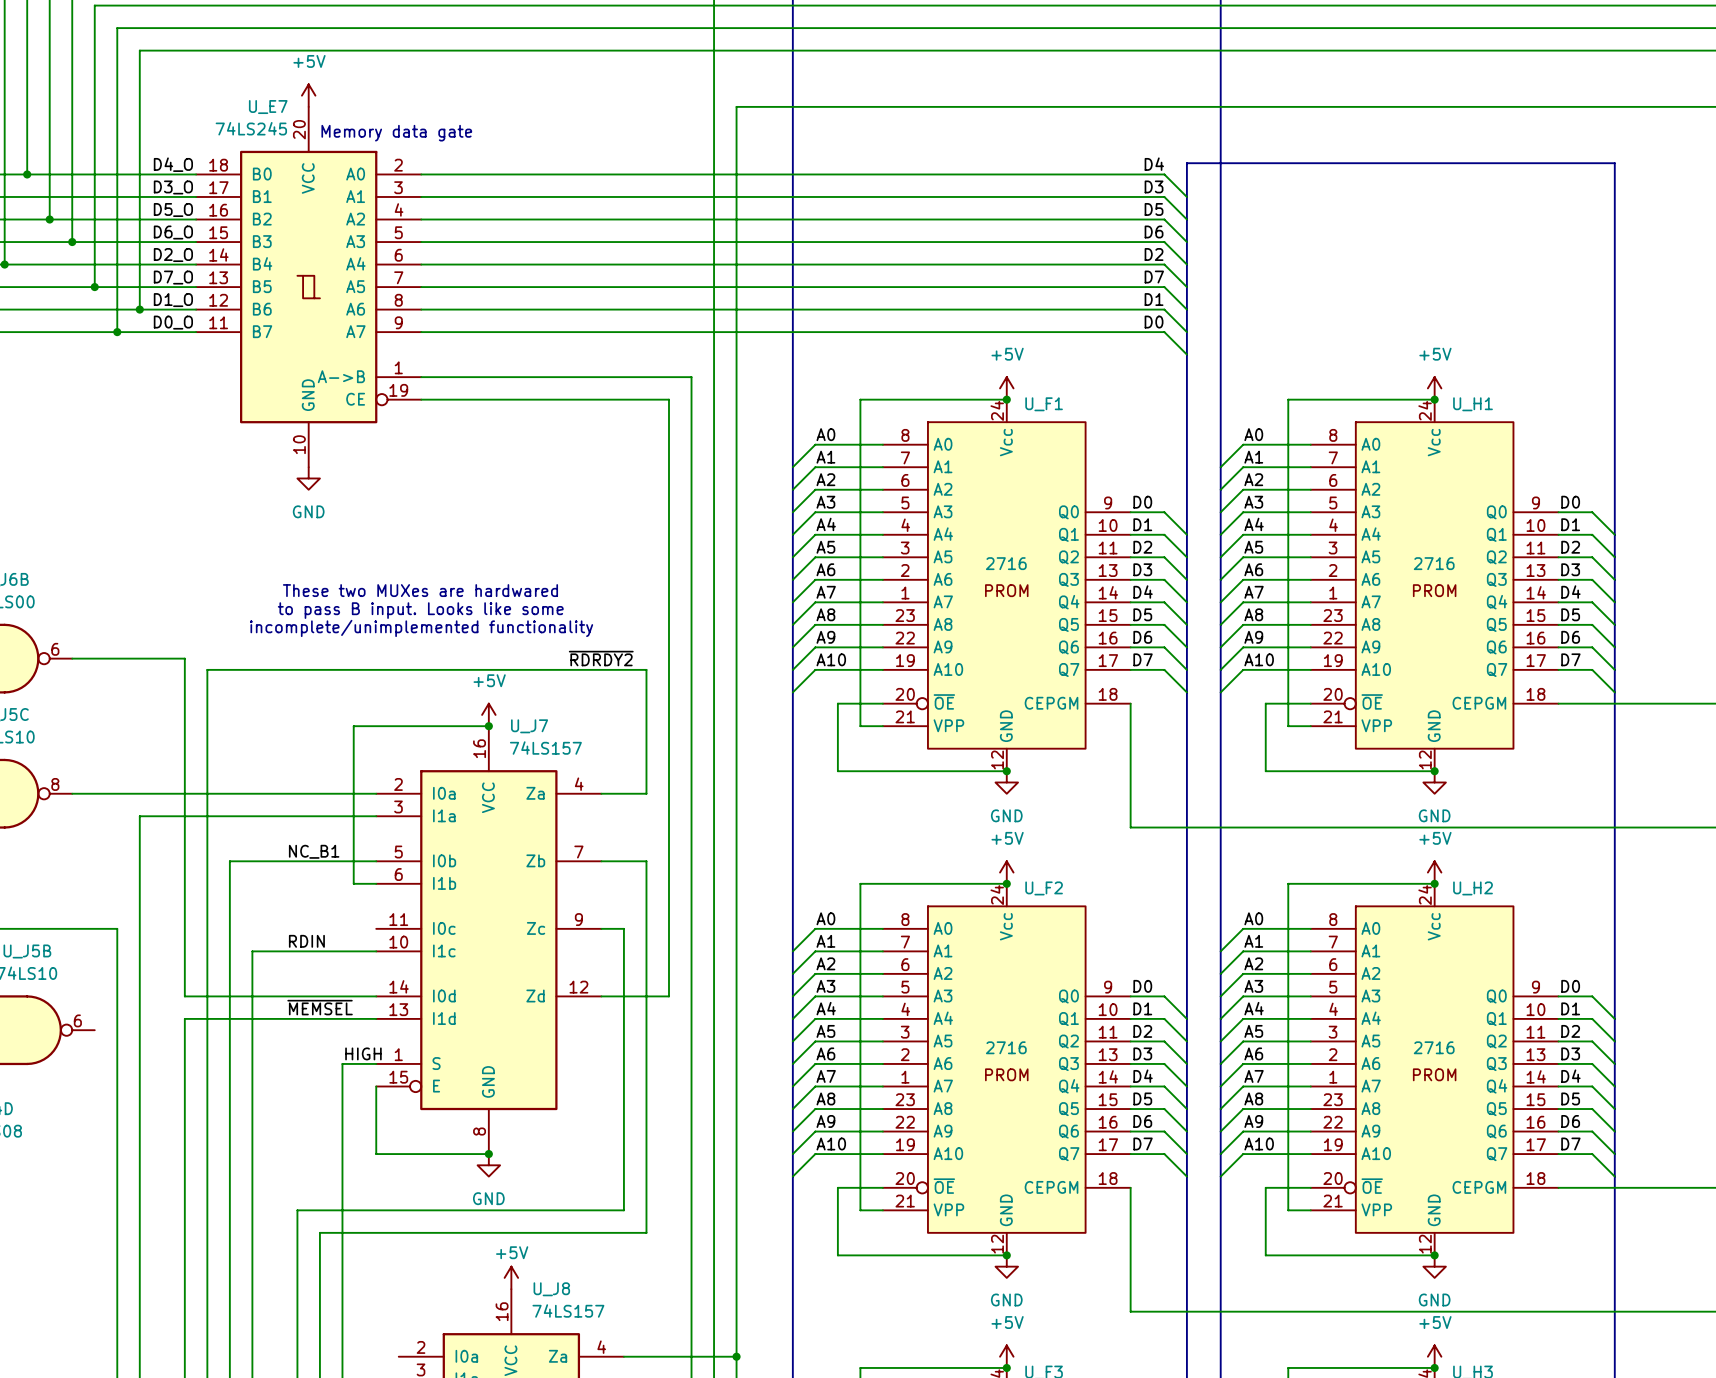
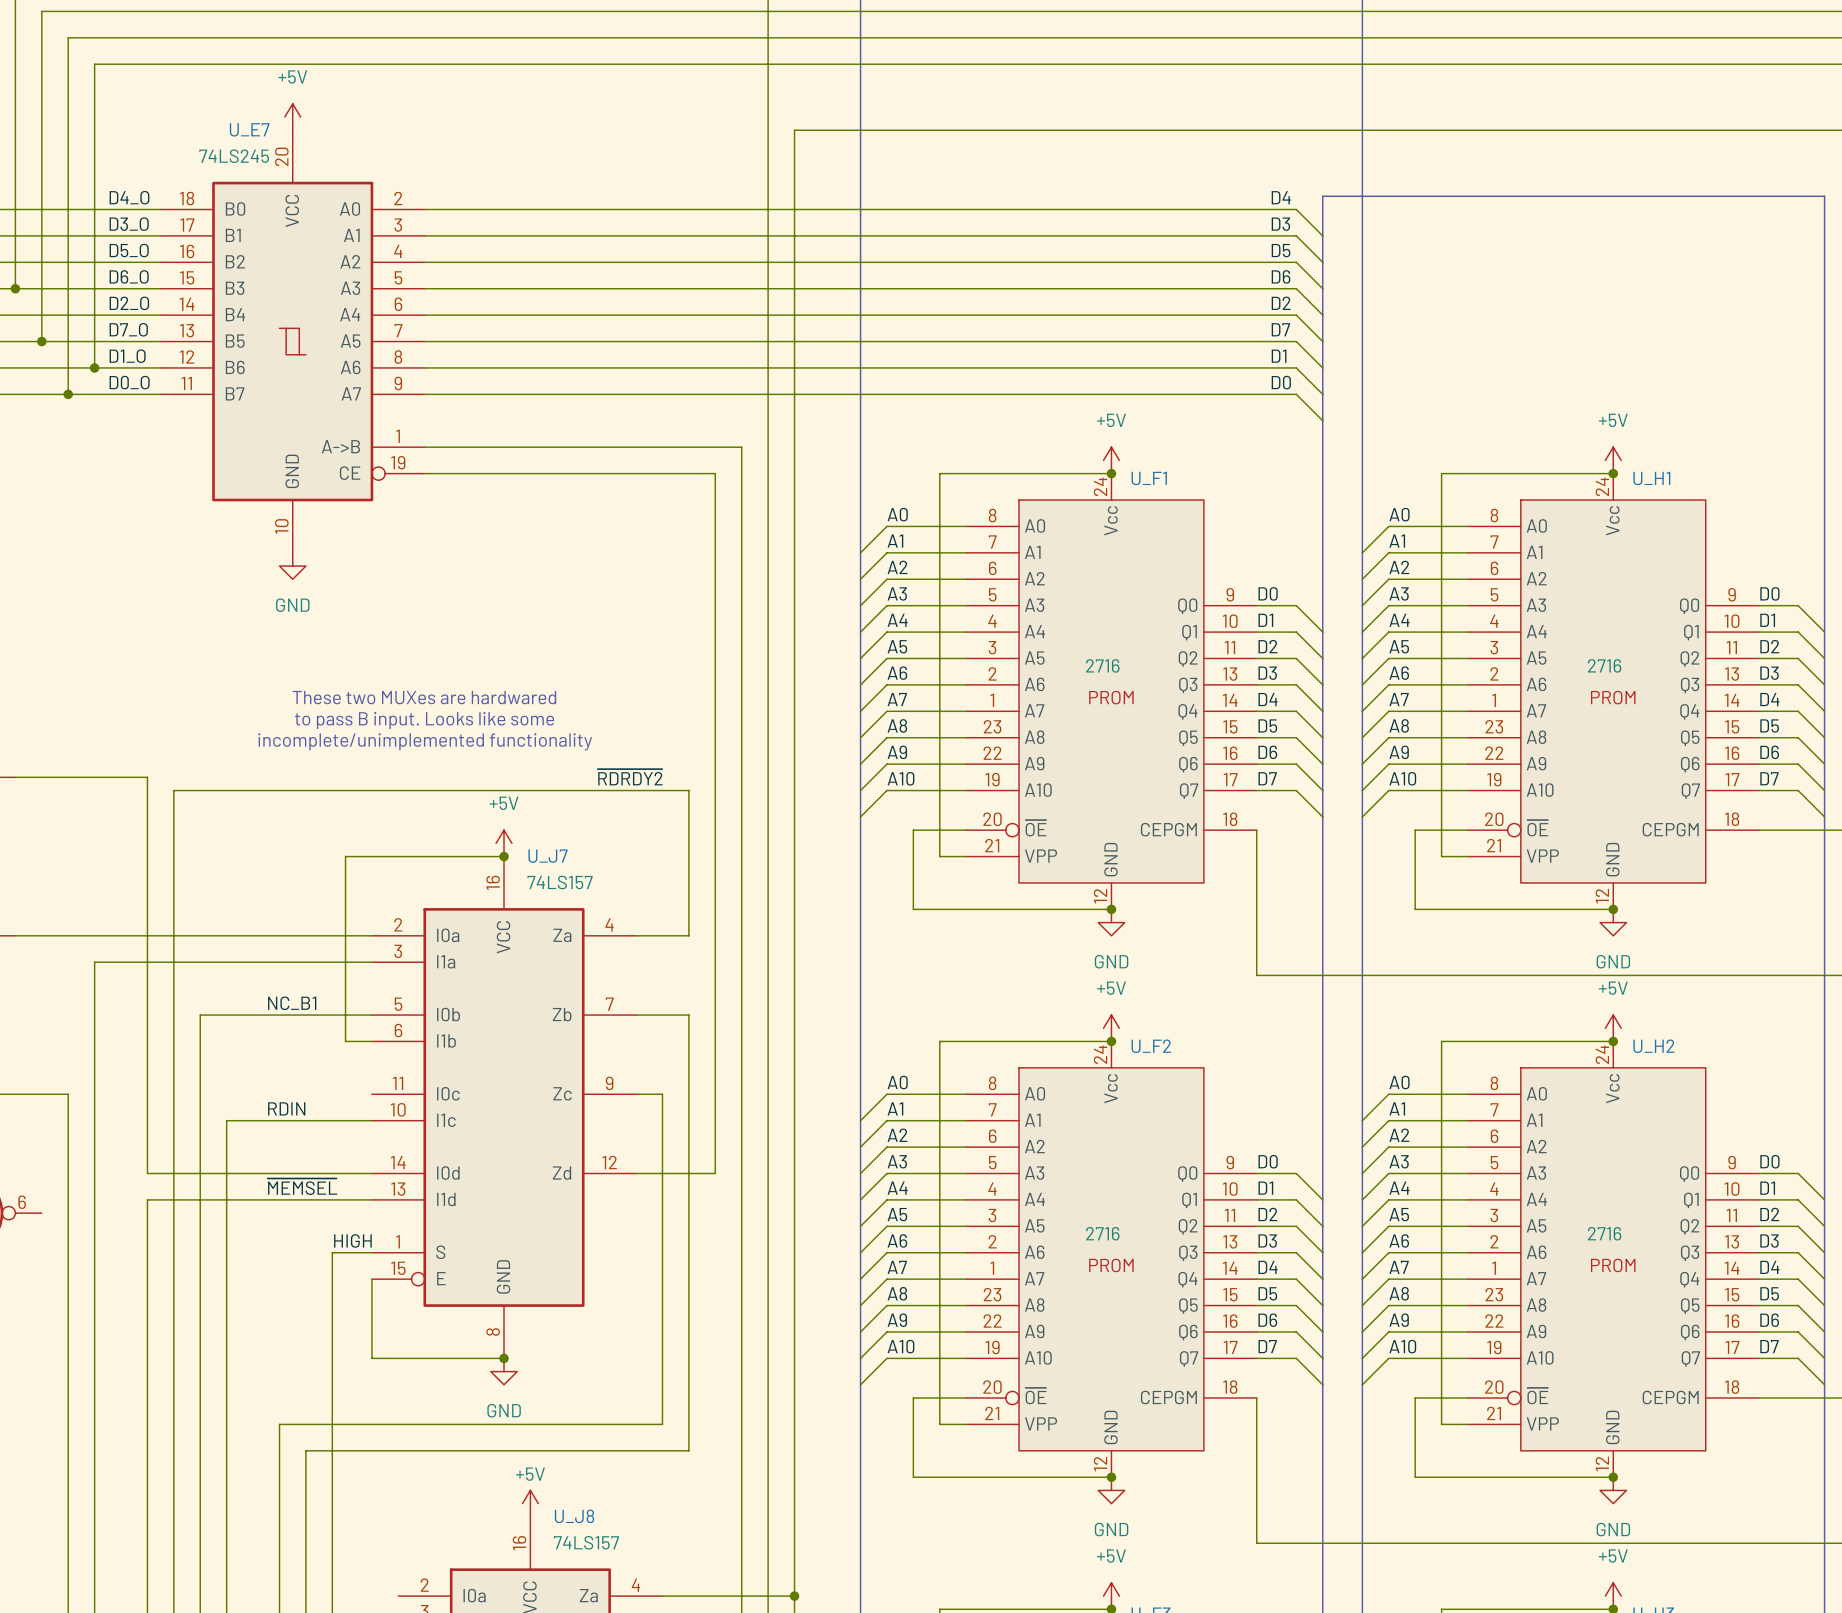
text: Memory data gate (396, 133) -> none

